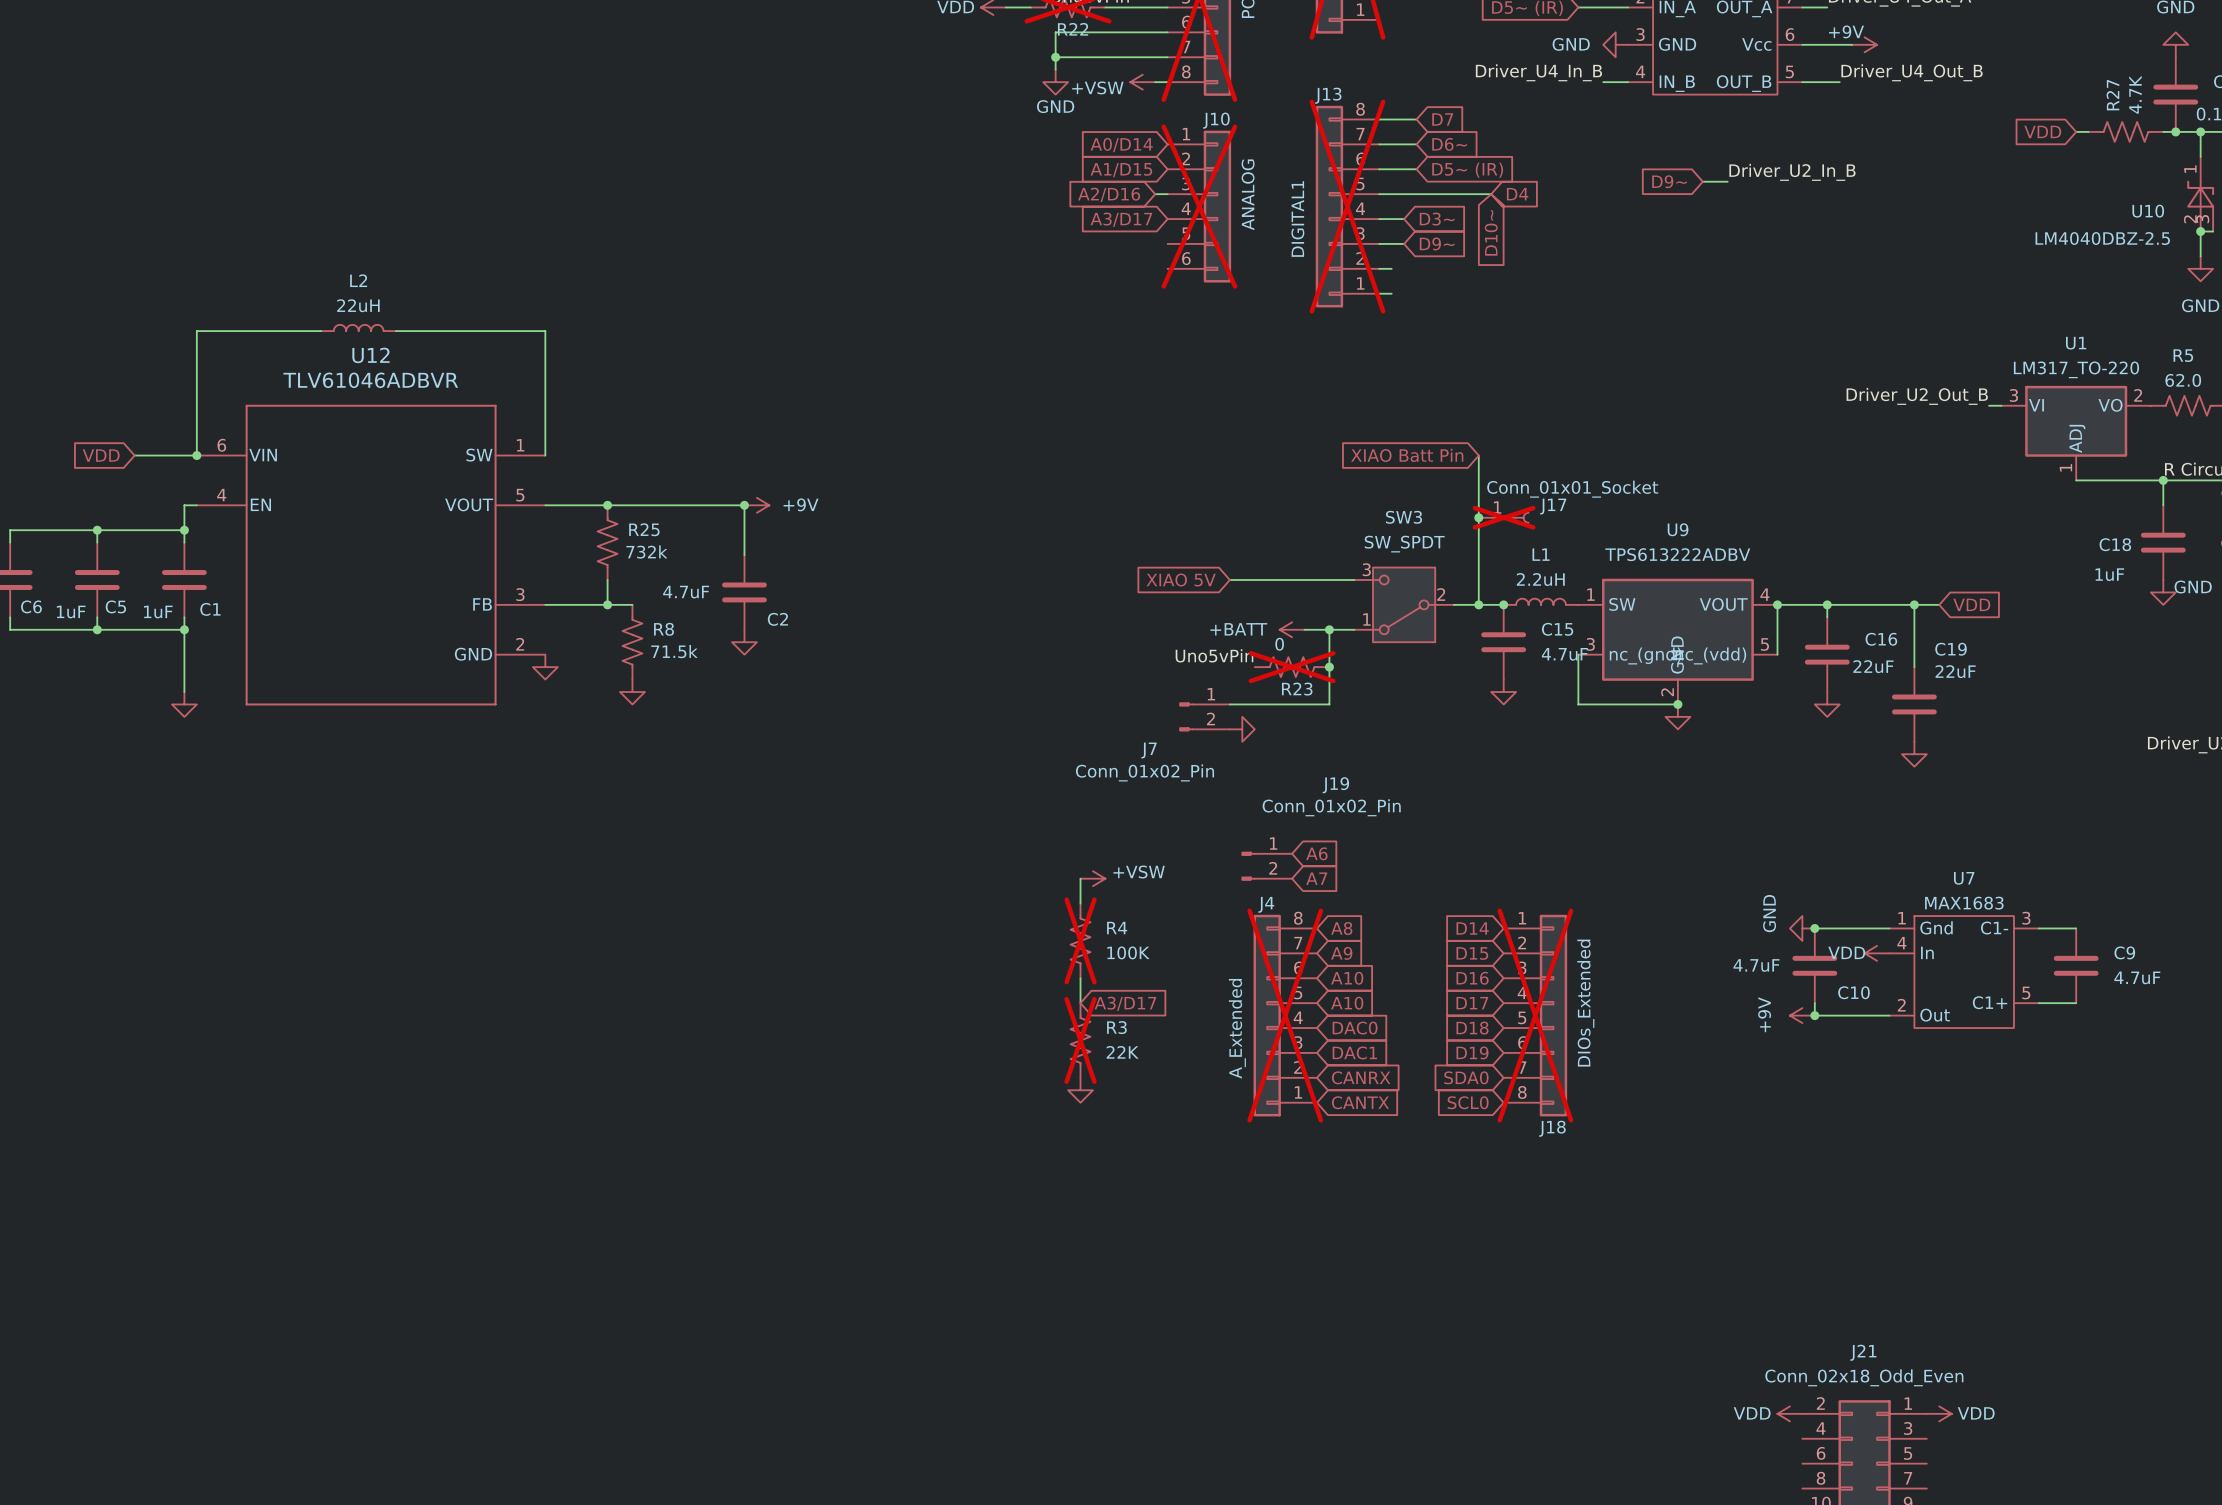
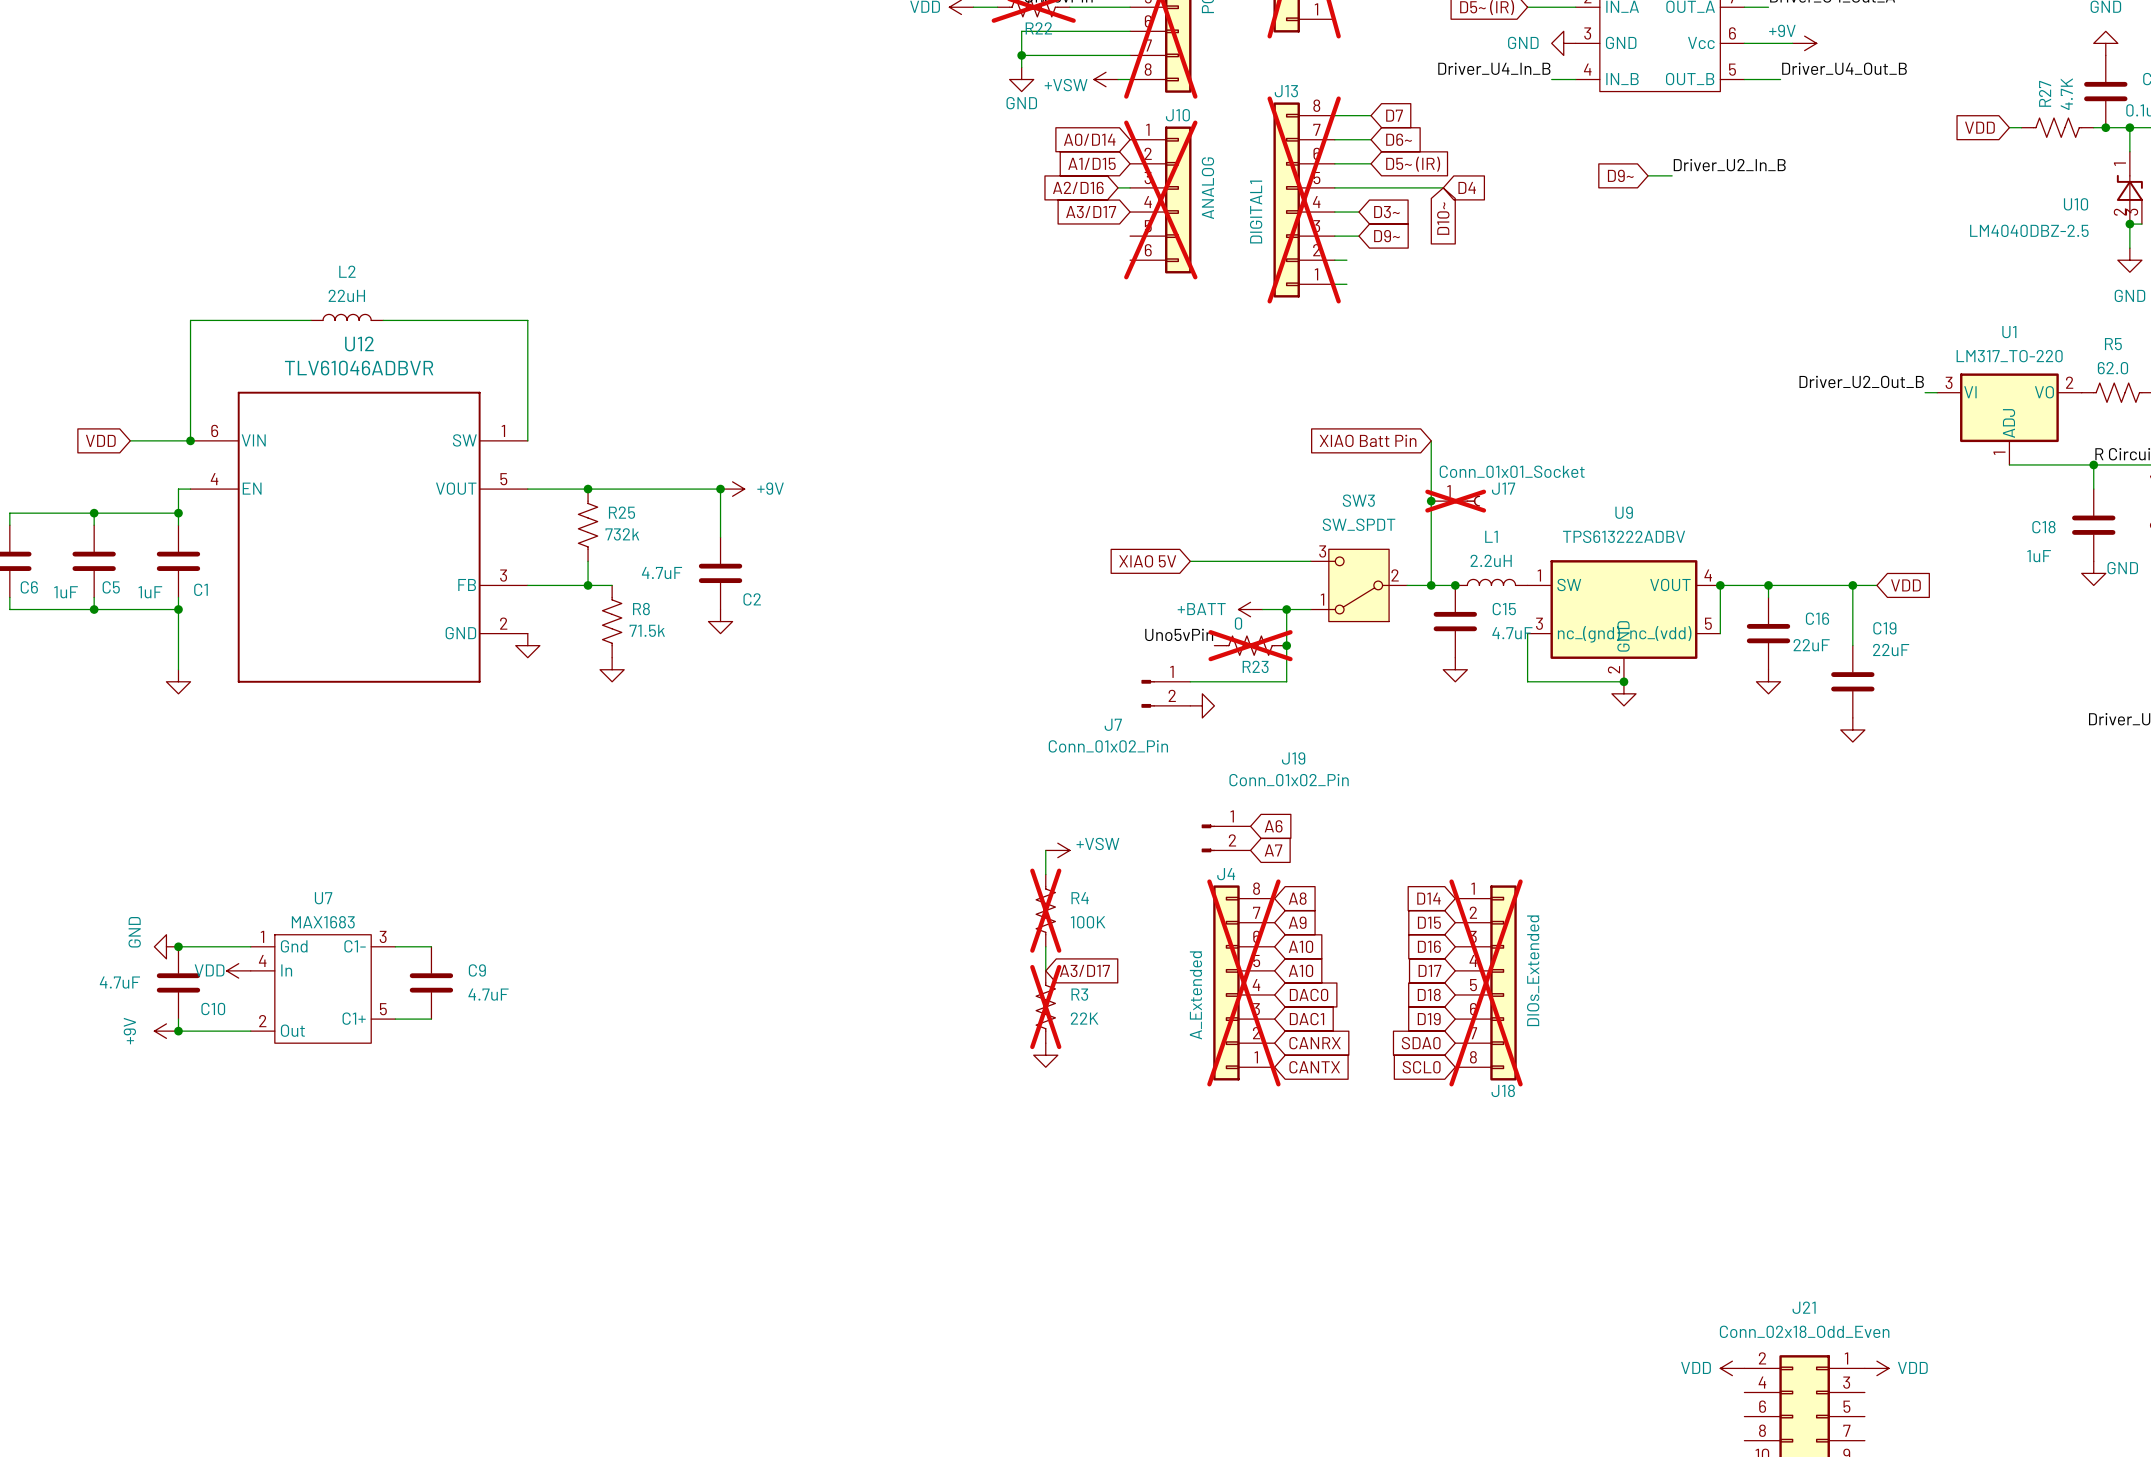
power symbol: GND (1802, 928) -> none
wire: (1814, 928) (1889, 928) -> none
junction: (1814, 928) -> none
wire: (2038, 928) (2076, 928) -> none
power symbol: VDD (1877, 953) -> none
C10 position: (1814, 965) -> (178, 982)
C9 position: (2076, 965) -> (431, 982)
U7 position: (1964, 972) -> (323, 988)
power symbol: none -> GND (166, 946)
wire: none -> (178, 946) (250, 946)
junction: none -> (178, 946)
wire: none -> (395, 946) (431, 946)
power symbol: none -> VDD (238, 970)
wire: (1814, 1003) (1814, 1015) (1889, 1015) -> none
wire: (2038, 1003) (2076, 1003) -> none
power symbol: +9V (1802, 1015) -> none
junction: (1814, 1015) -> none
wire: none -> (178, 1019) (178, 1031) (250, 1031)
wire: none -> (395, 1019) (431, 1019)
power symbol: none -> +9V (166, 1031)
junction: none -> (178, 1031)

